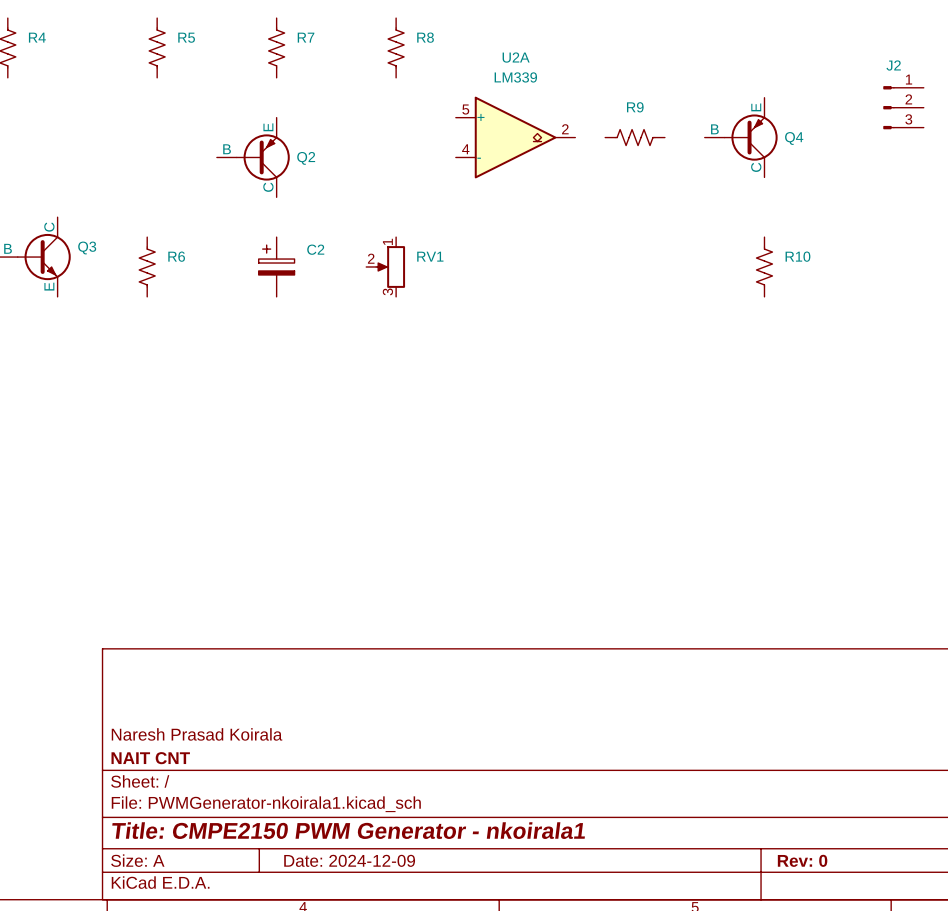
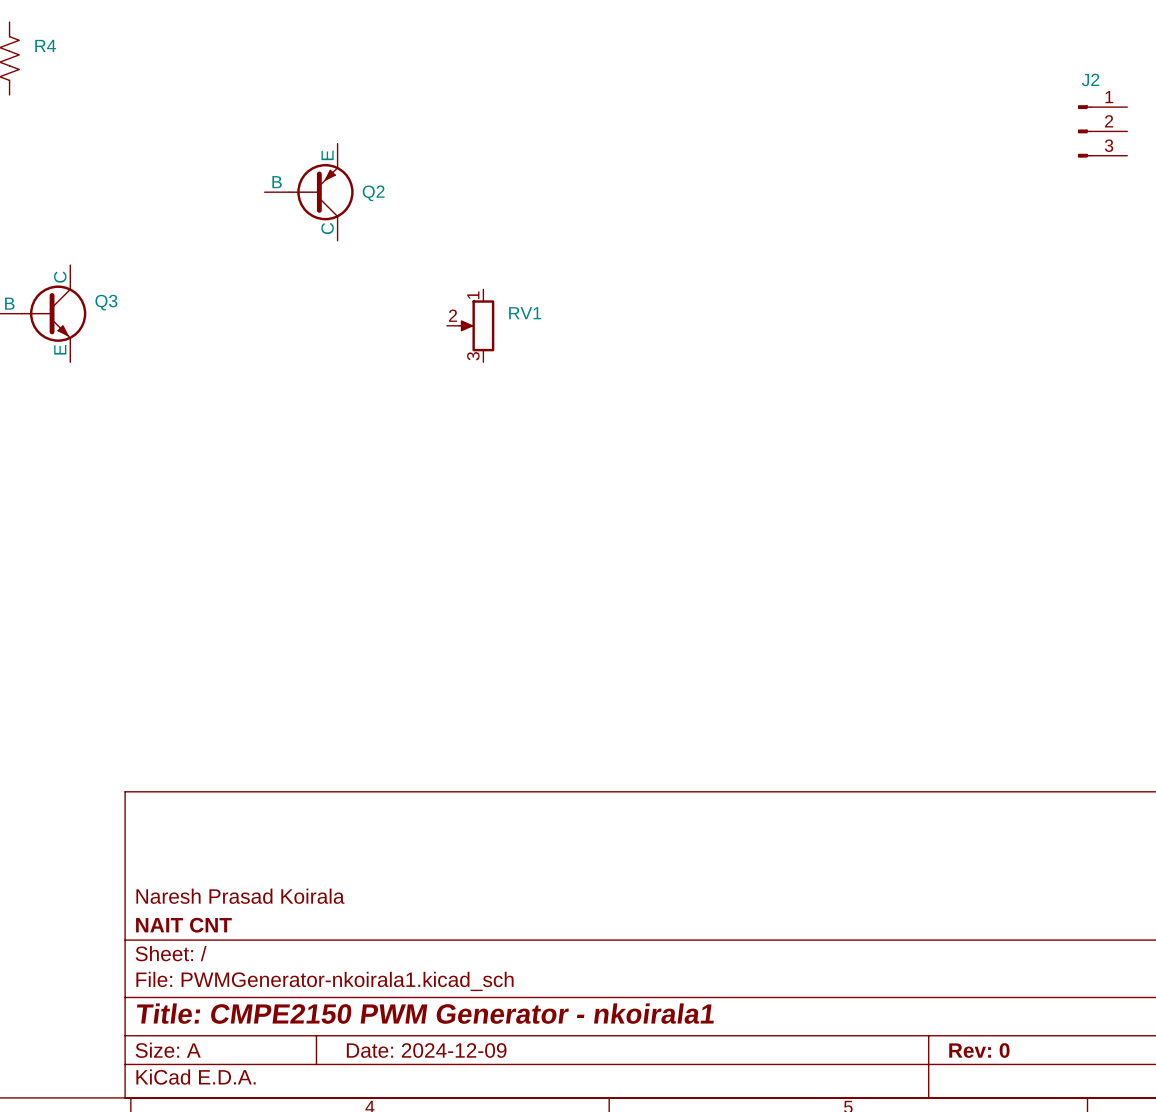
R5: (157, 47) -> none
R7: (276, 47) -> none
R8: (396, 47) -> none
U2A: LM339 (515, 137) -> none
R9: (635, 137) -> none
Q4: (741, 137) -> none
R6: (147, 266) -> none
C2: (276, 266) -> none
R10: (764, 266) -> none

